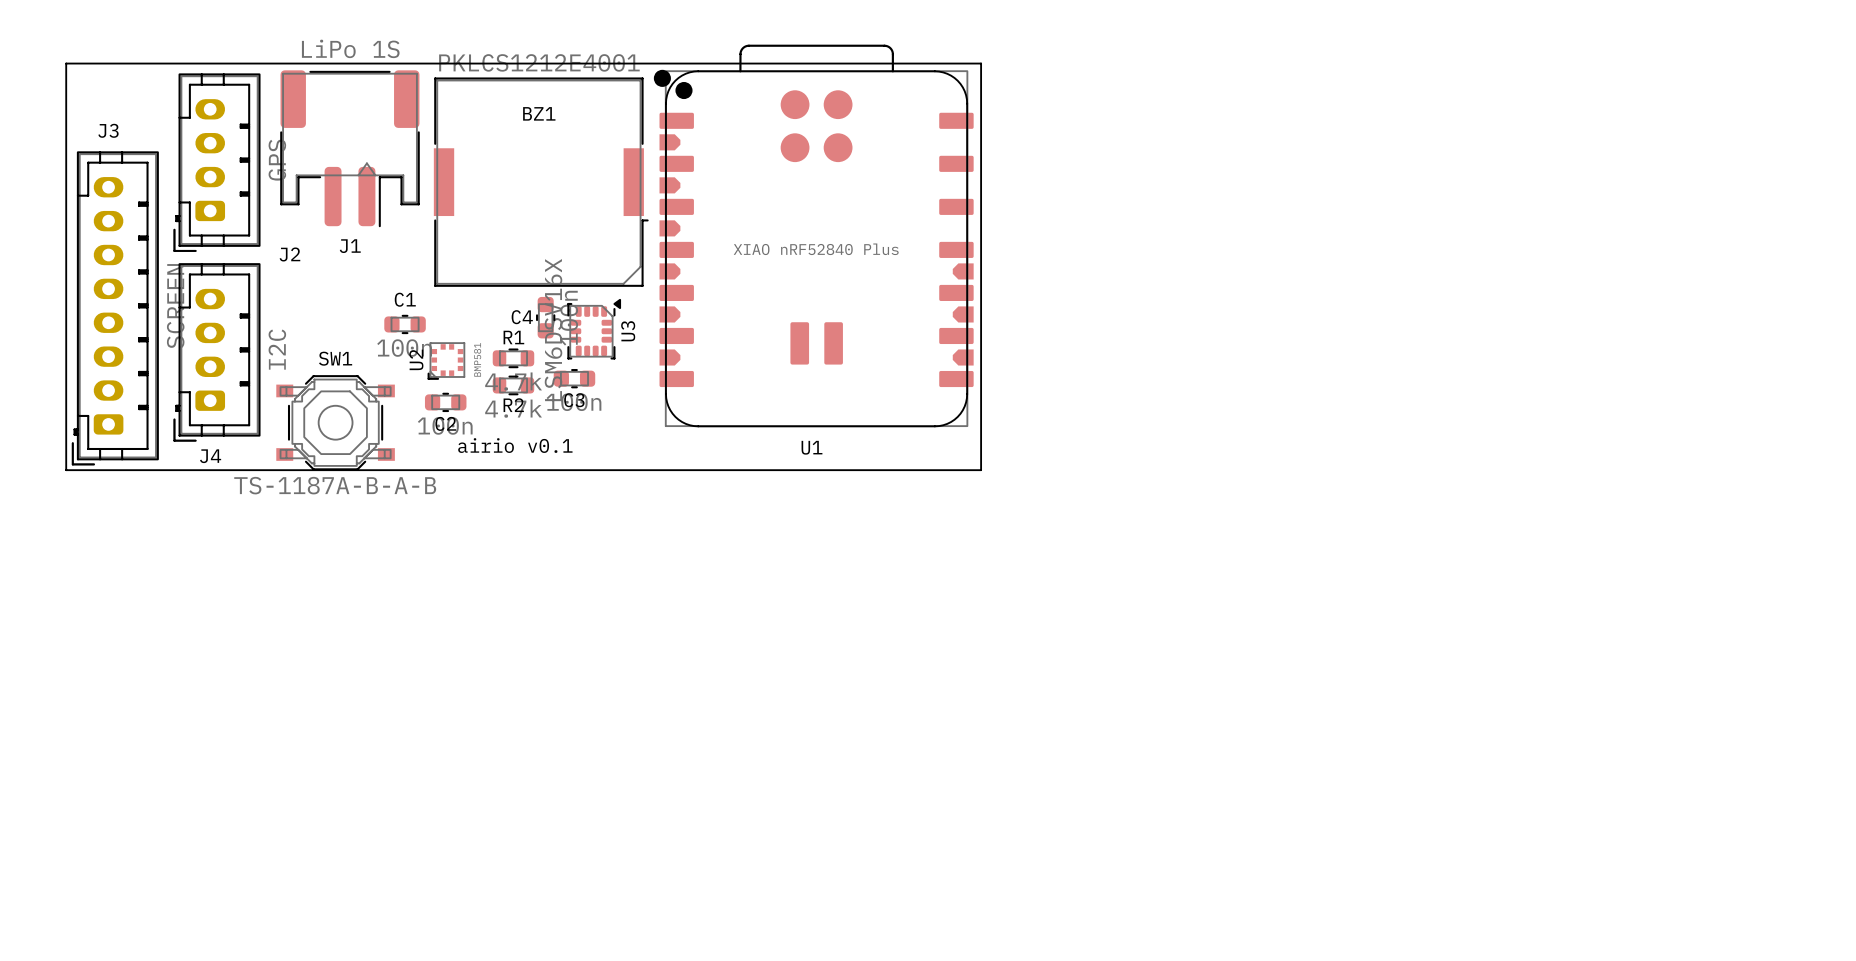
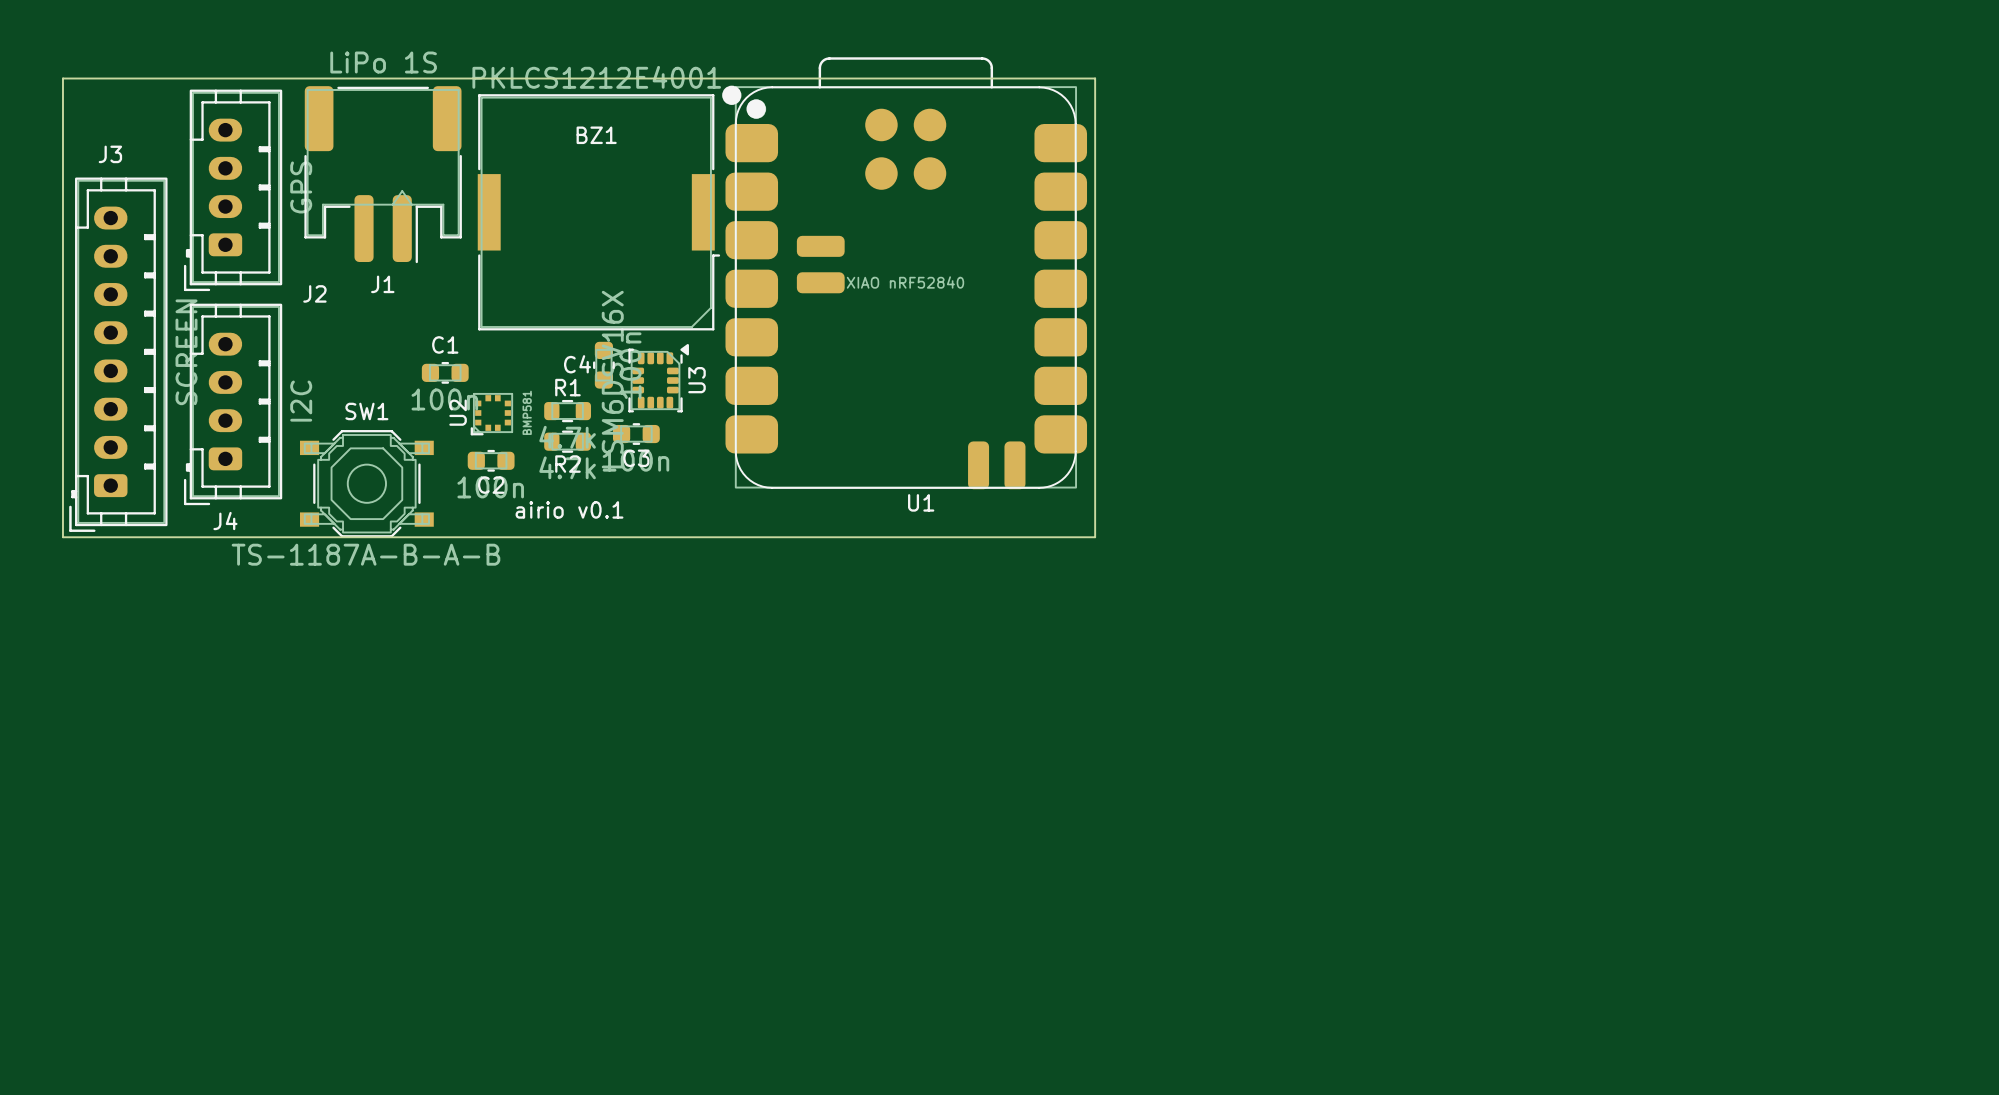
U1 footprint: [653, 44, 974, 428] -> [722, 57, 1088, 490]
U1 value: XIAO nRF52840 Plus (816, 249) -> XIAO nRF52840 (905, 282)

